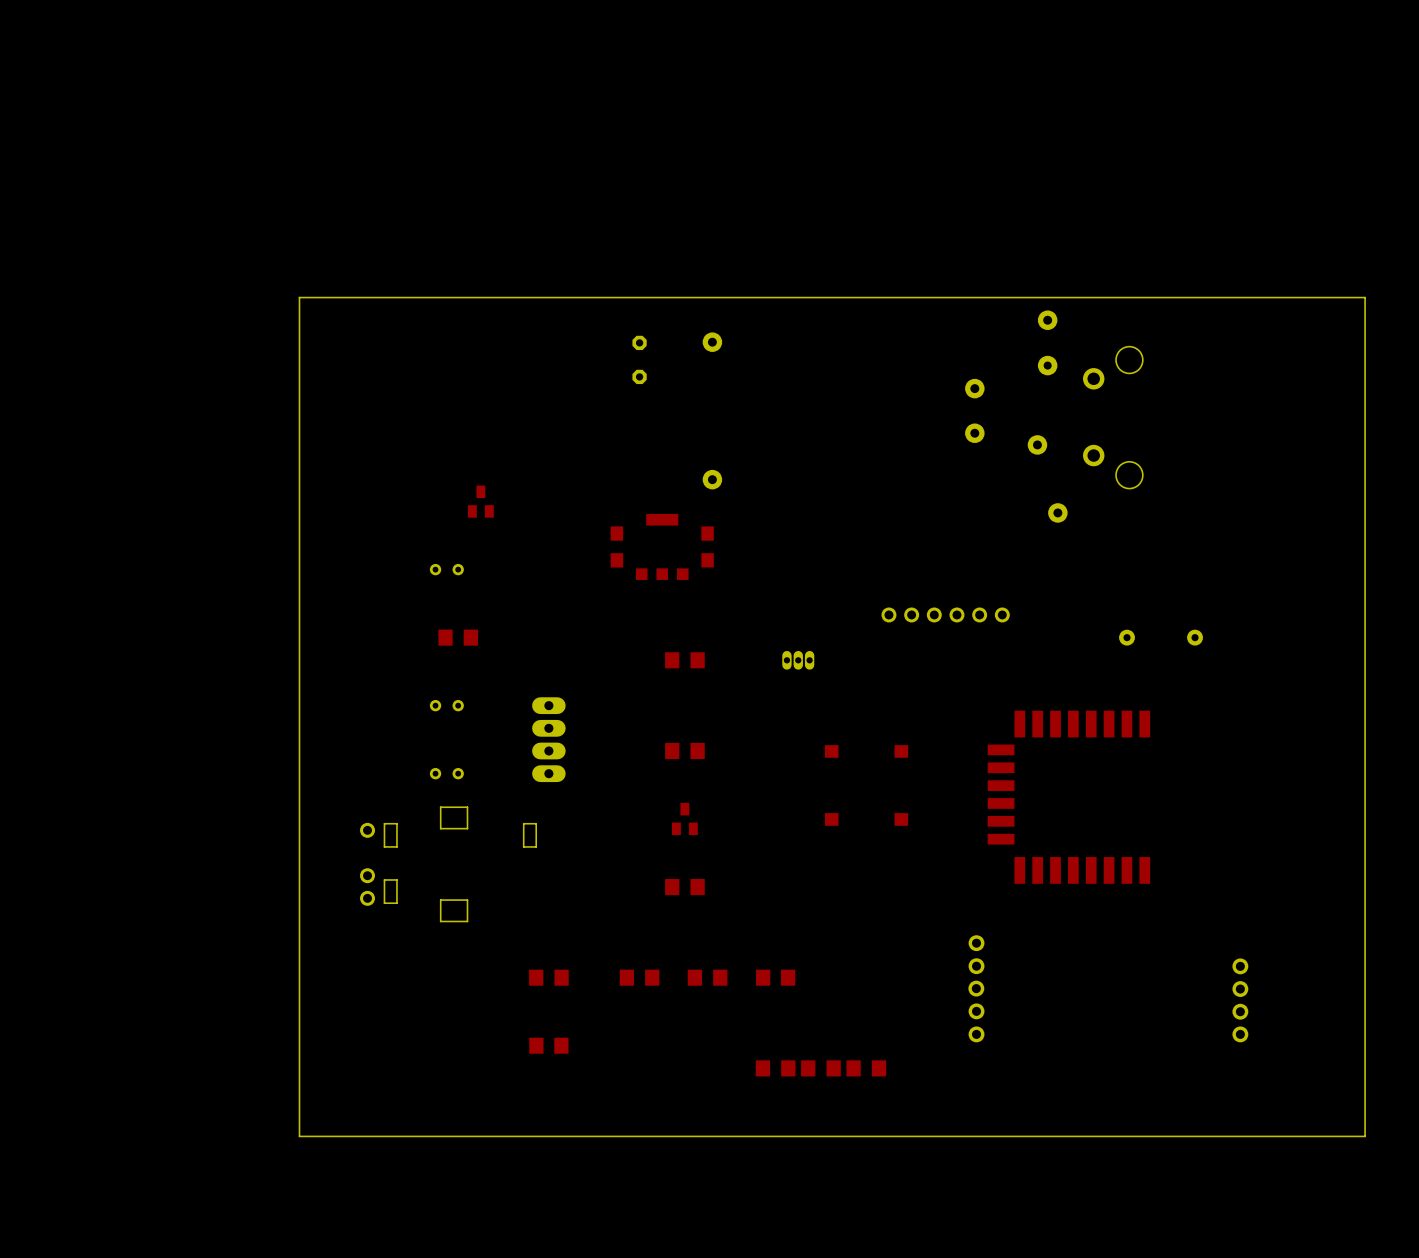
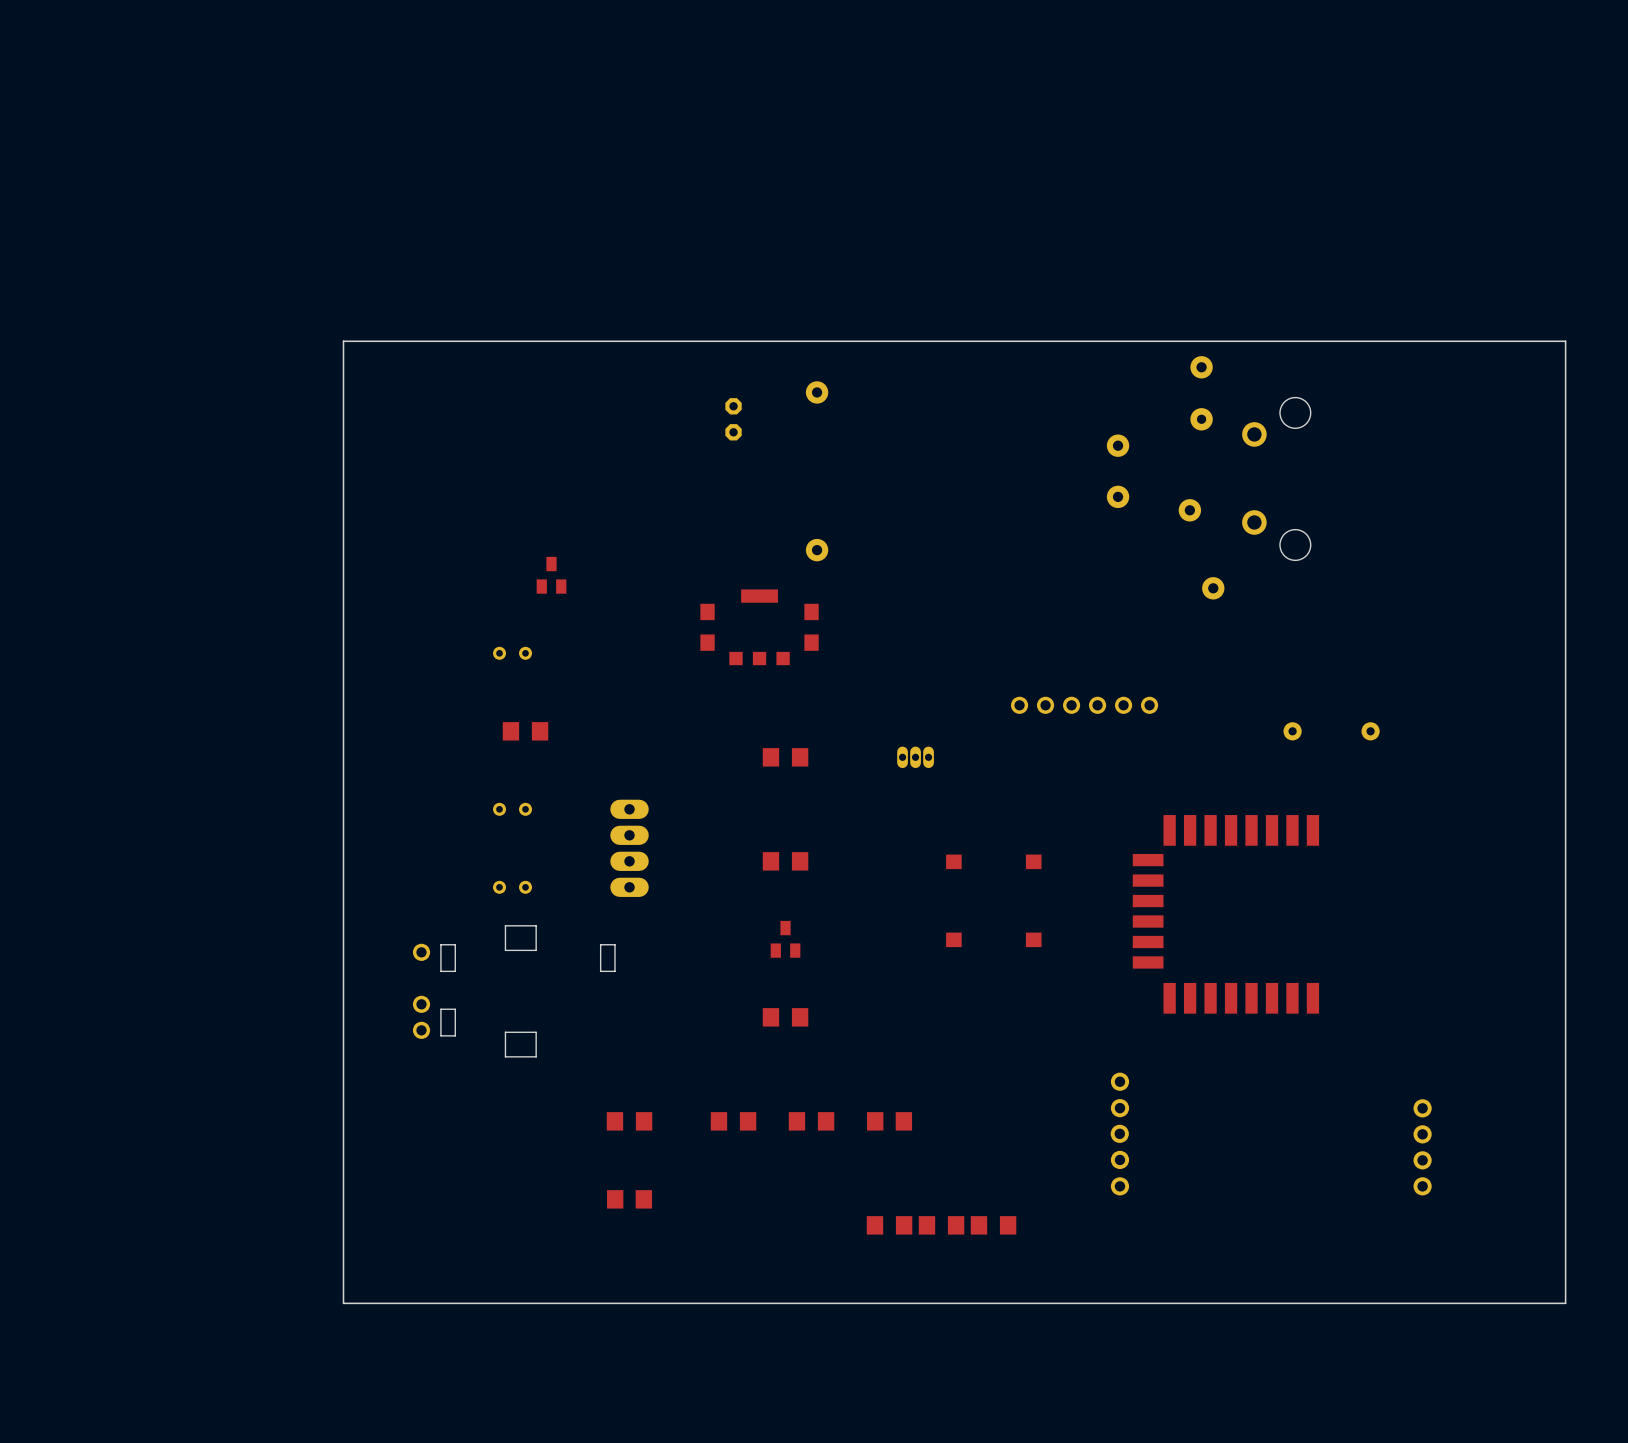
part footprint: [632, 335, 647, 385] -> [725, 398, 742, 441]

